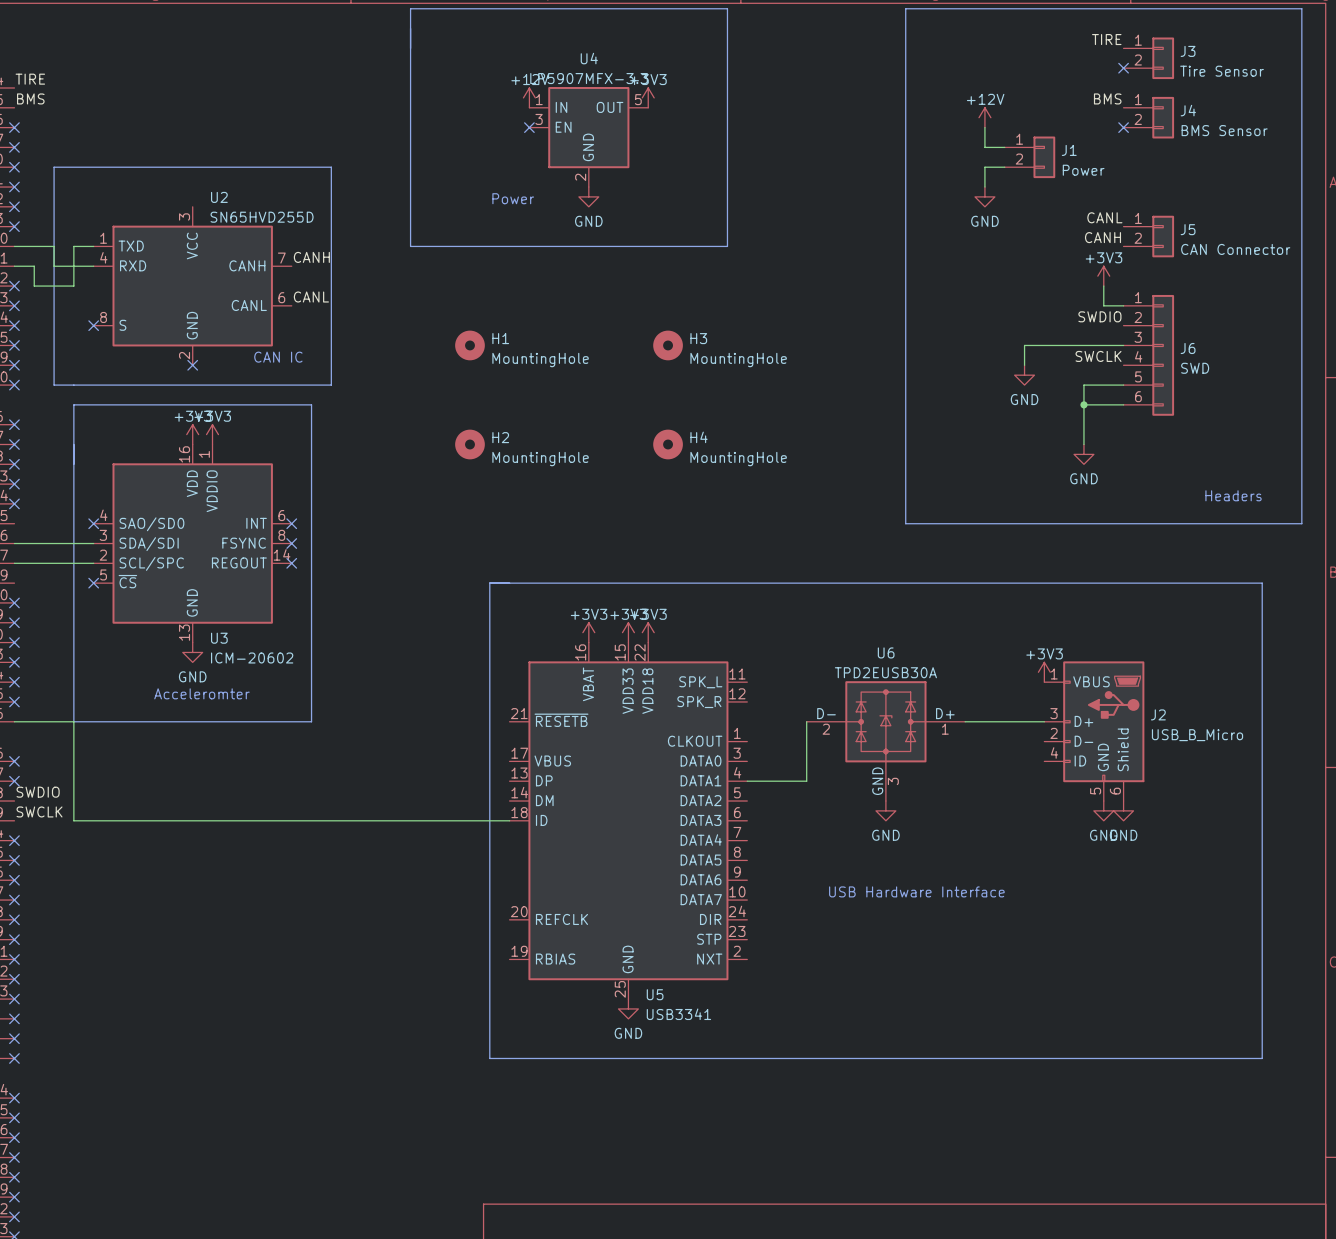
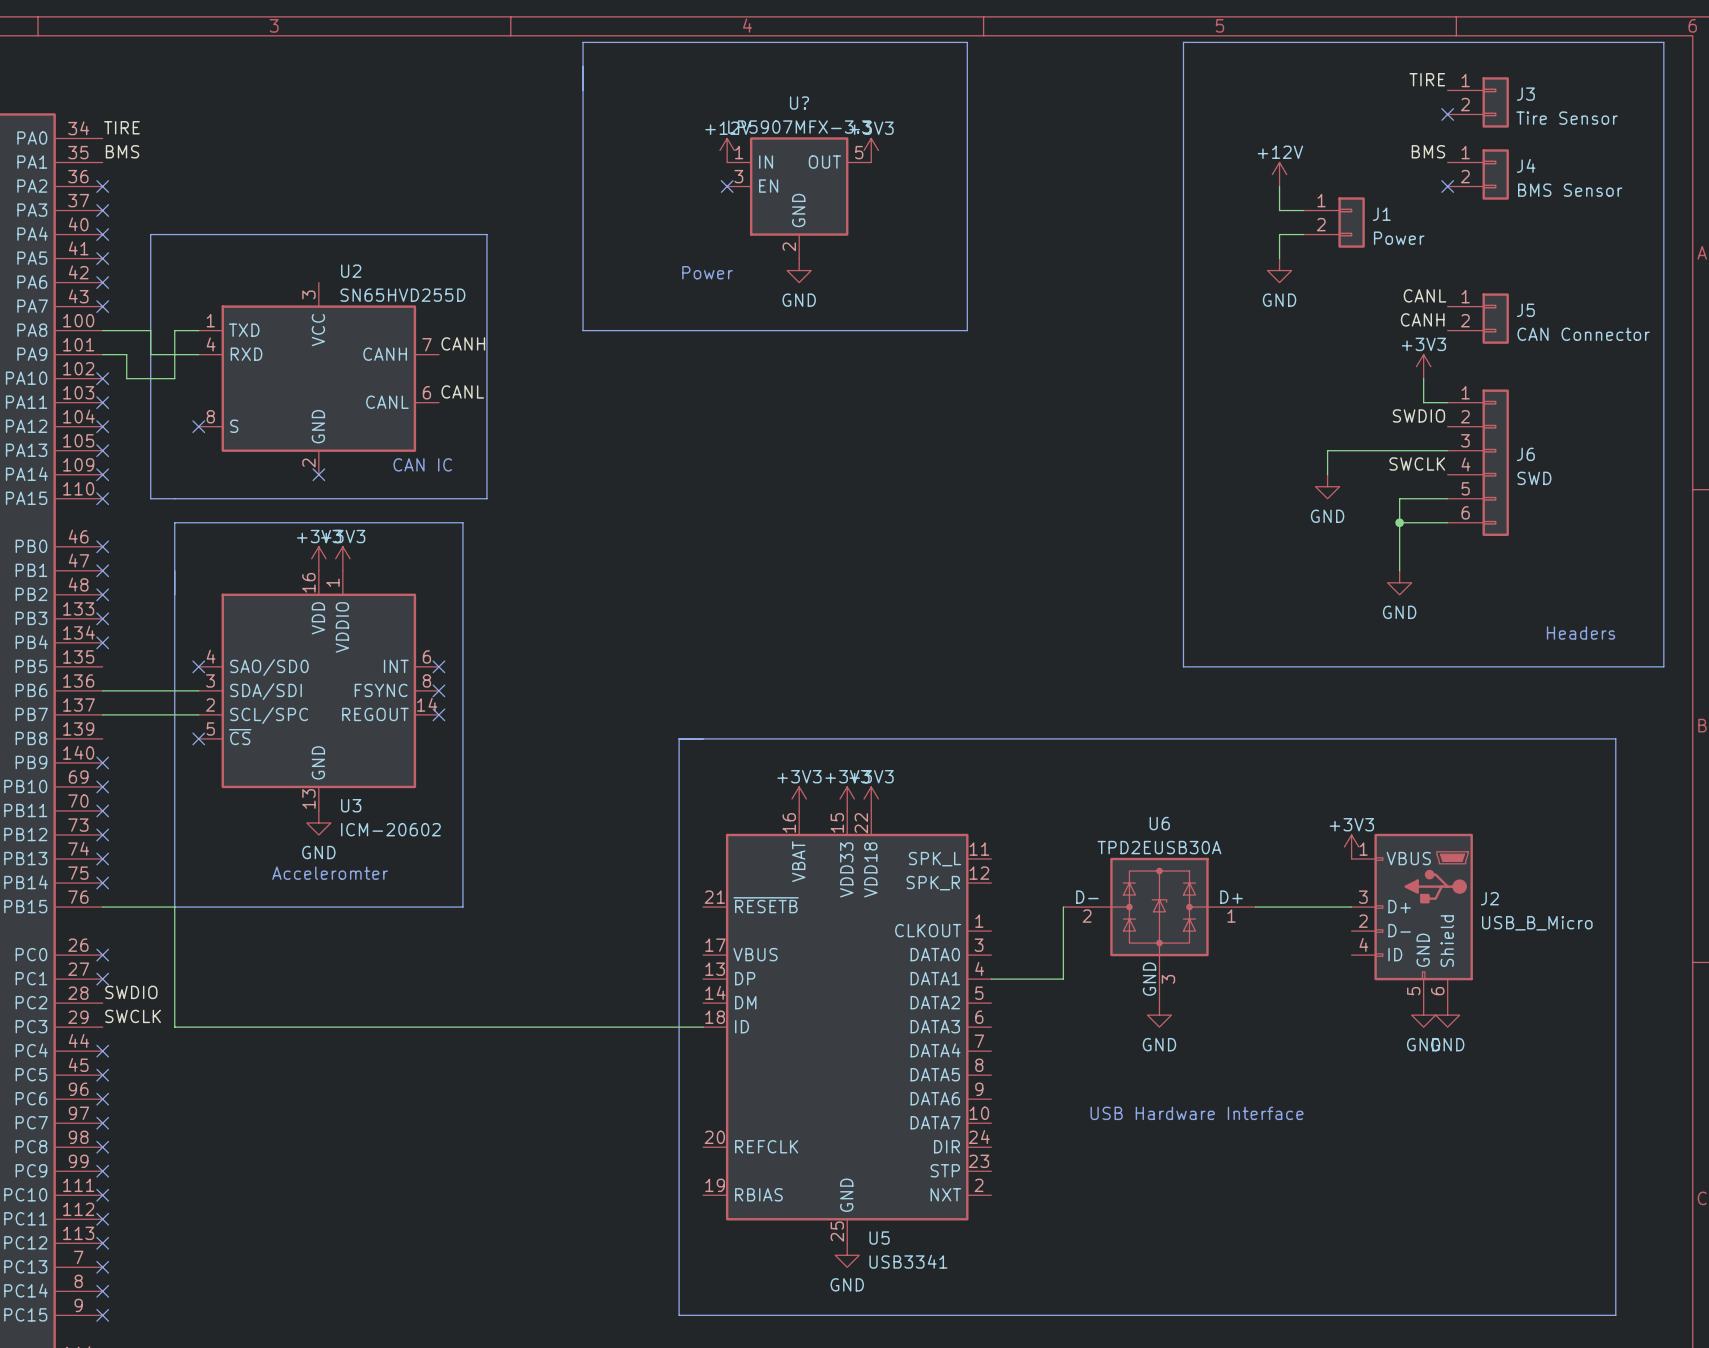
U4 name: U4 (589, 58) -> U? (799, 103)
H1: MountingHole (469, 345) -> none
H3: MountingHole (668, 345) -> none
H2: MountingHole (469, 444) -> none
H4: MountingHole (668, 444) -> none

